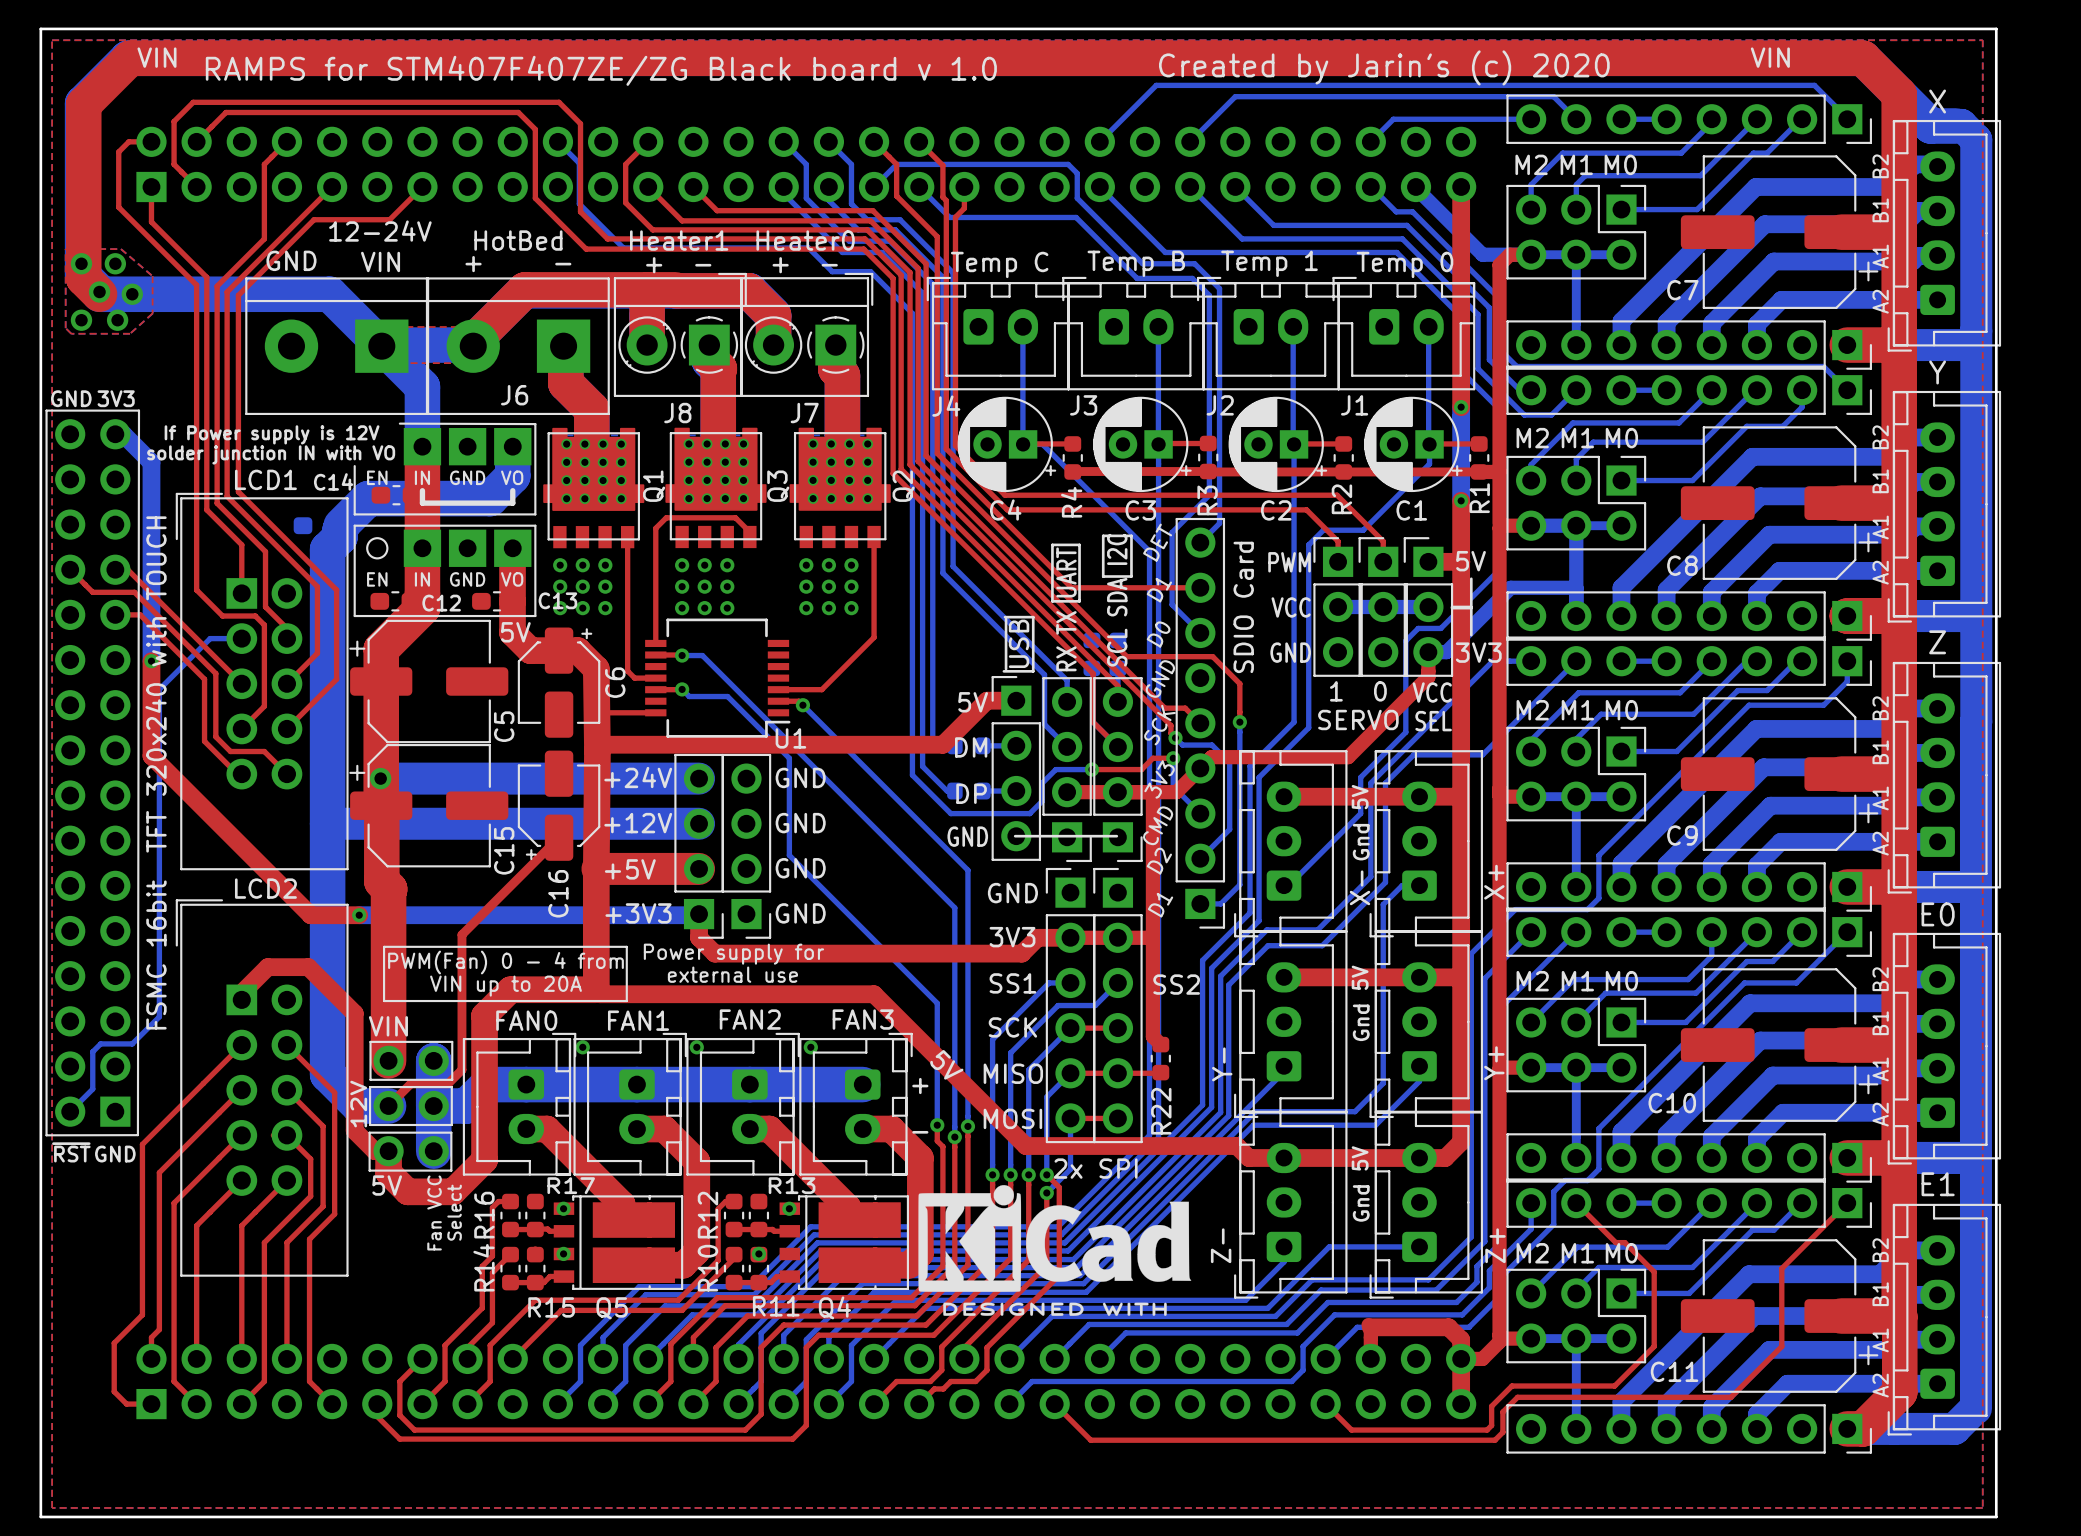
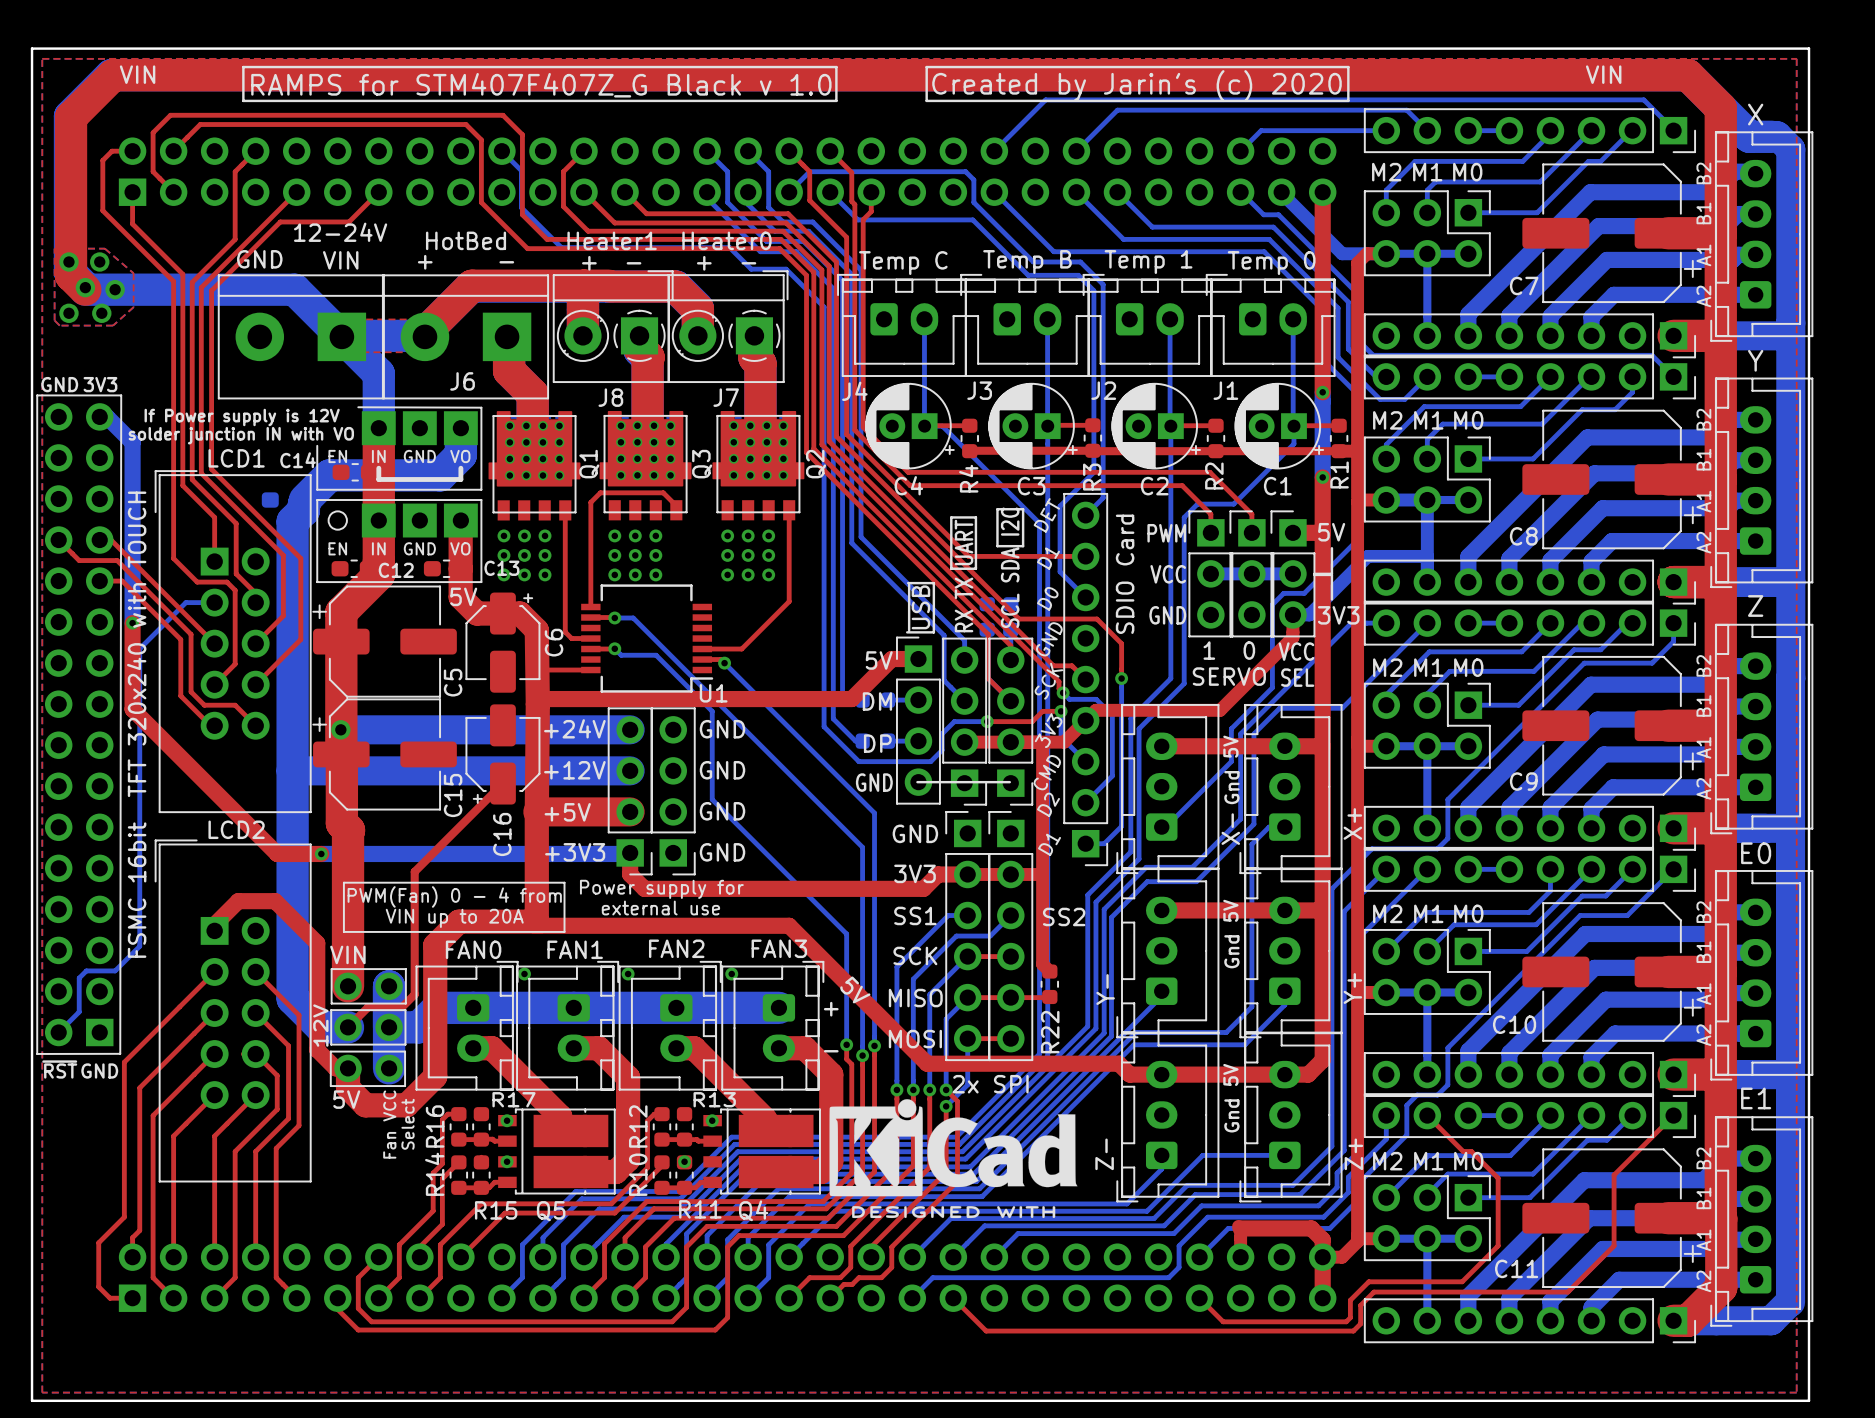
line: none -> (243, 67) (836, 67) (836, 100) (243, 100) (243, 67)
line: none -> (926, 67) (1348, 67) (1348, 100) (926, 100) (926, 67)
text position: Created by Jarin's (c) 2020 (1384, 67) -> Created by Jarin's (c) 2020 (1137, 86)
text: RAMPS for STM407F407ZE/ZG Black board v 1.0 (601, 70) -> RAMPS for STM407F407Z_G Black v 1.0 (541, 85)

